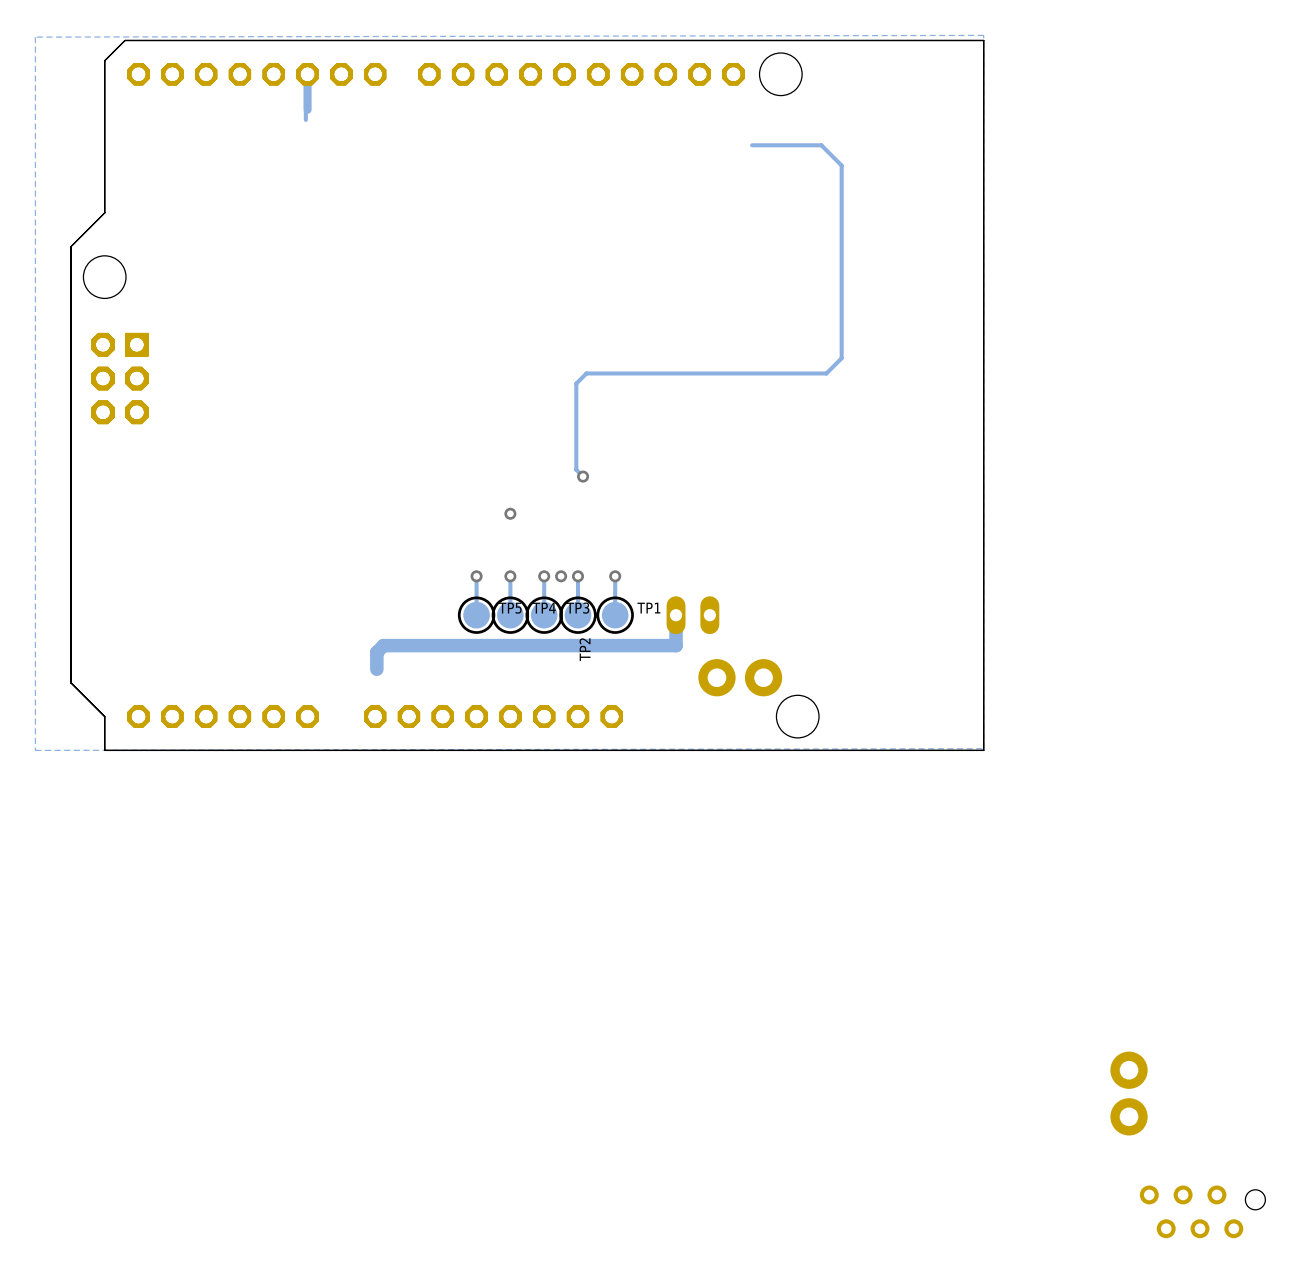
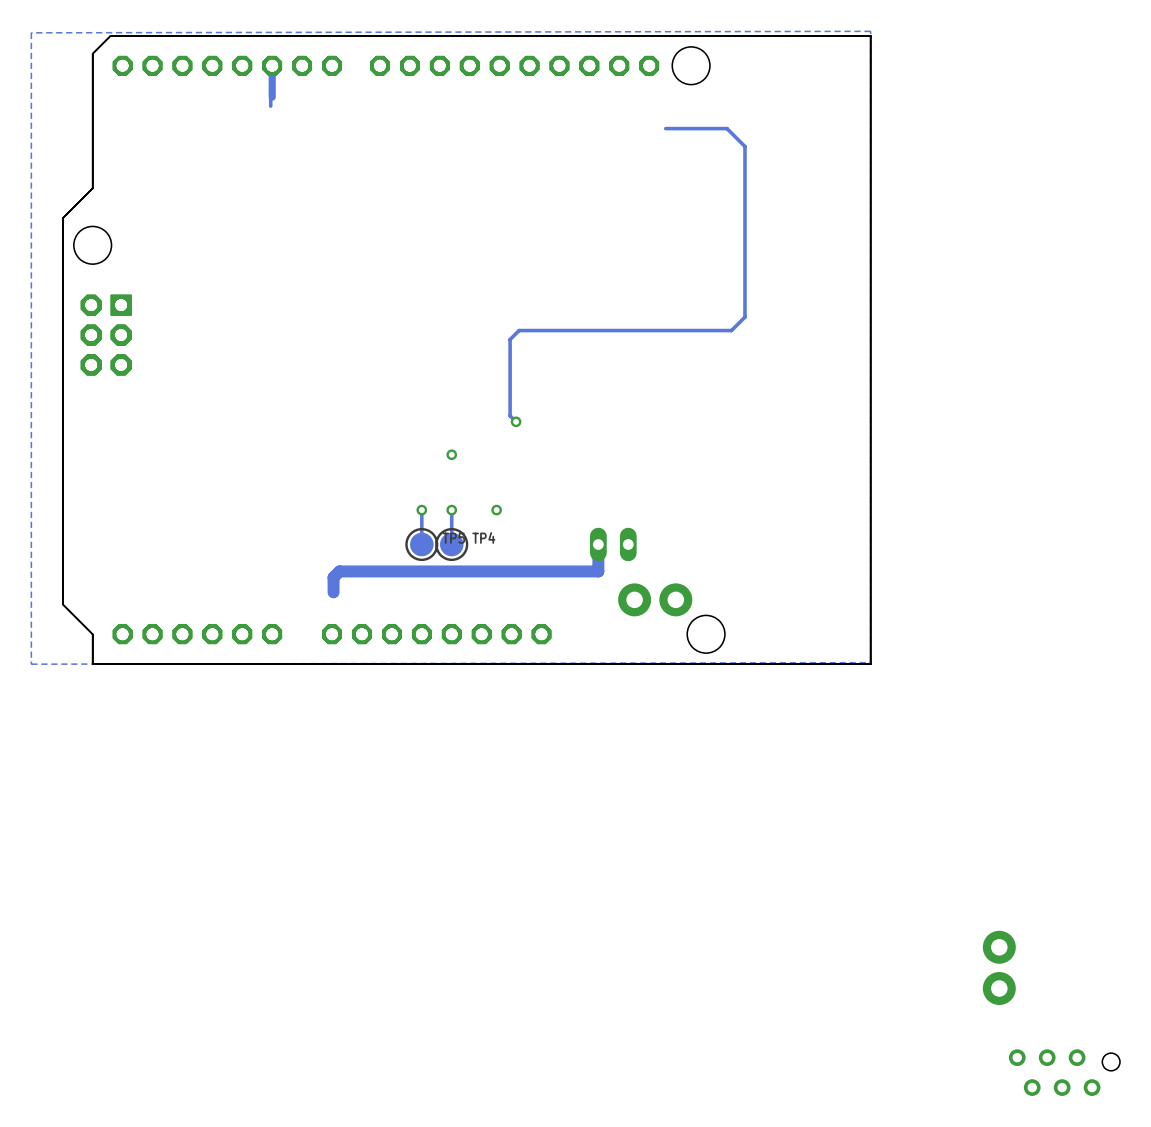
track: (544, 576) (544, 615) -> none
via: (544, 576) -> none
track: (578, 576) (578, 615) -> none
via: (578, 576) -> none
track: (615, 576) (615, 615) -> none
via: (615, 576) -> none
TP3: (544, 615) -> none
TP2: (578, 615) -> none
TP1: (615, 615) -> none

